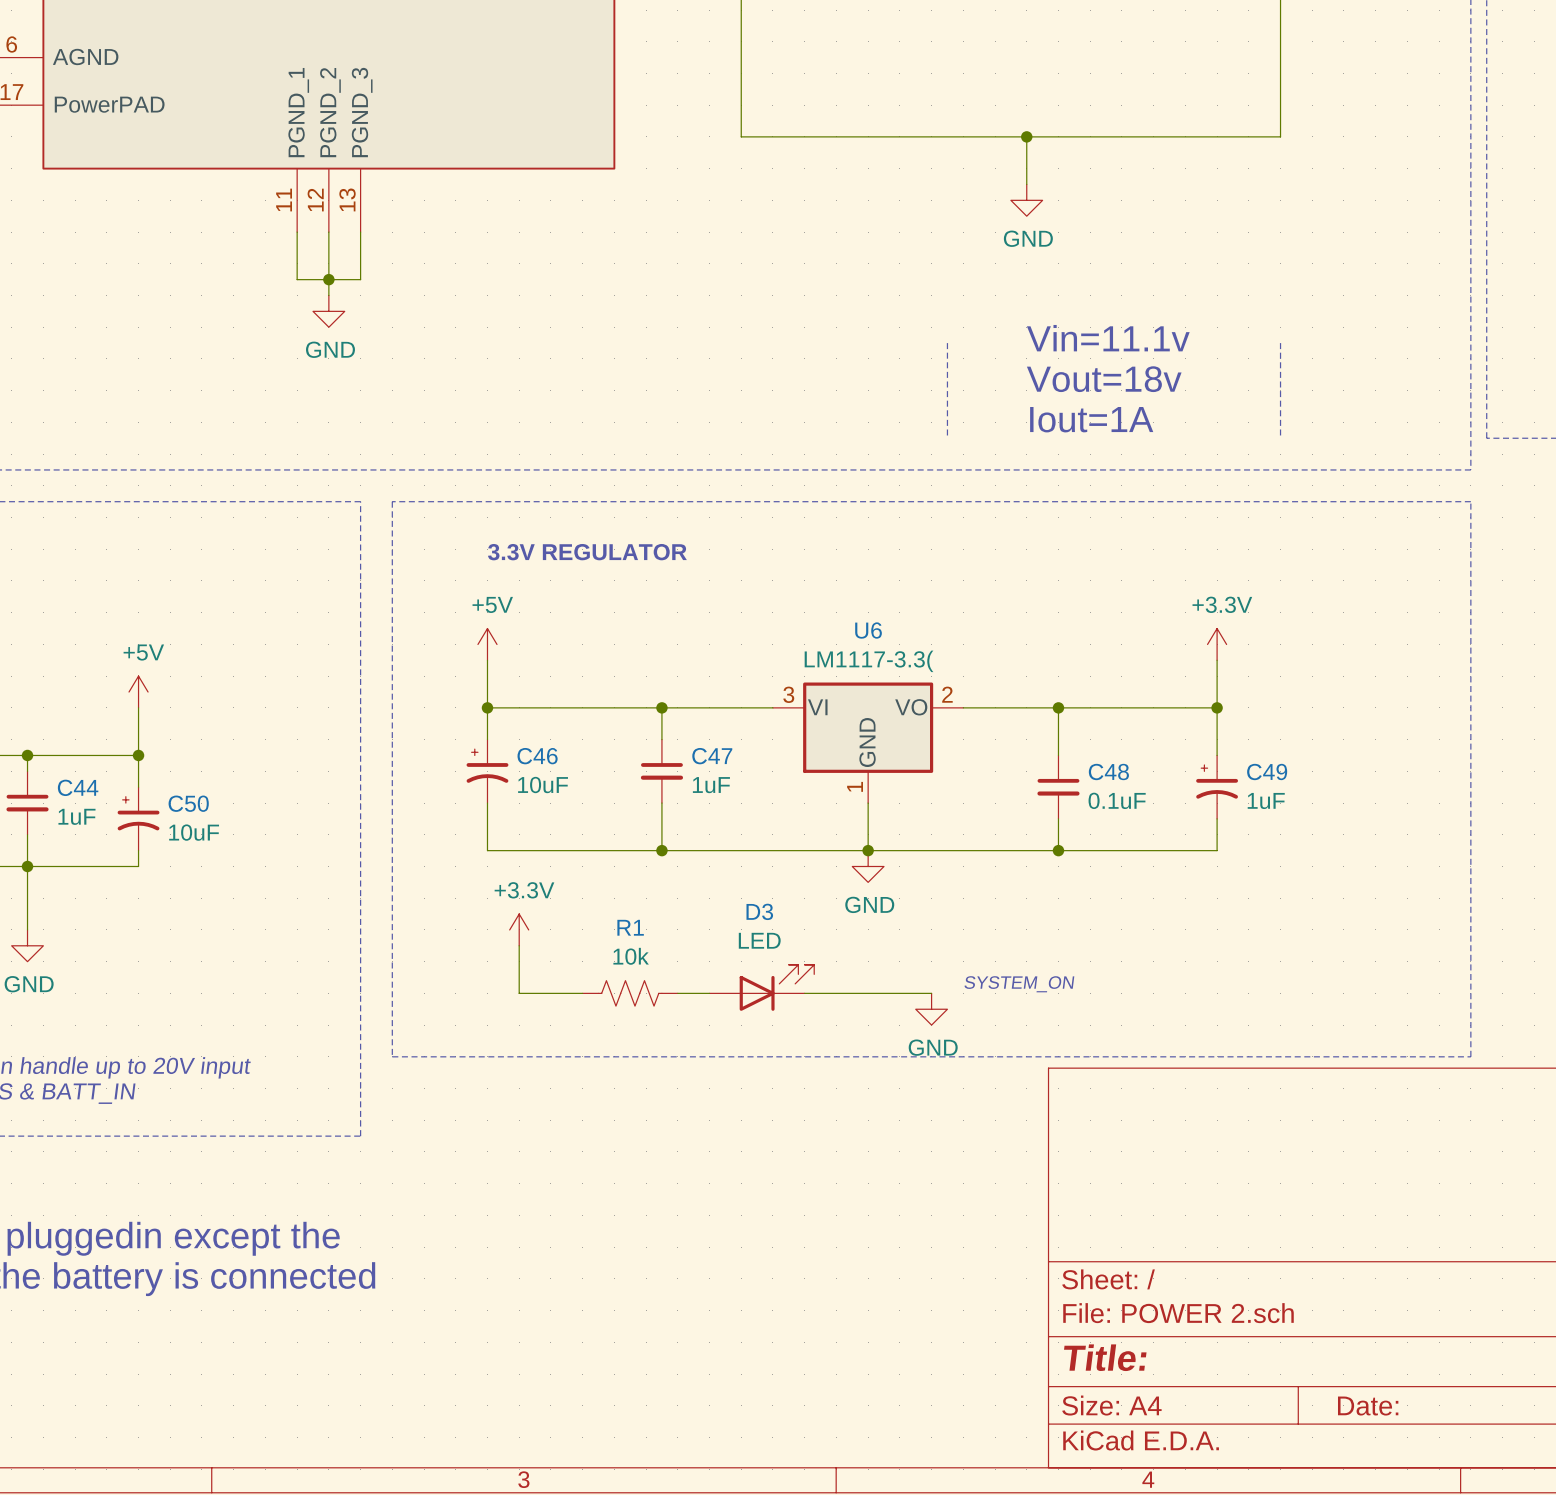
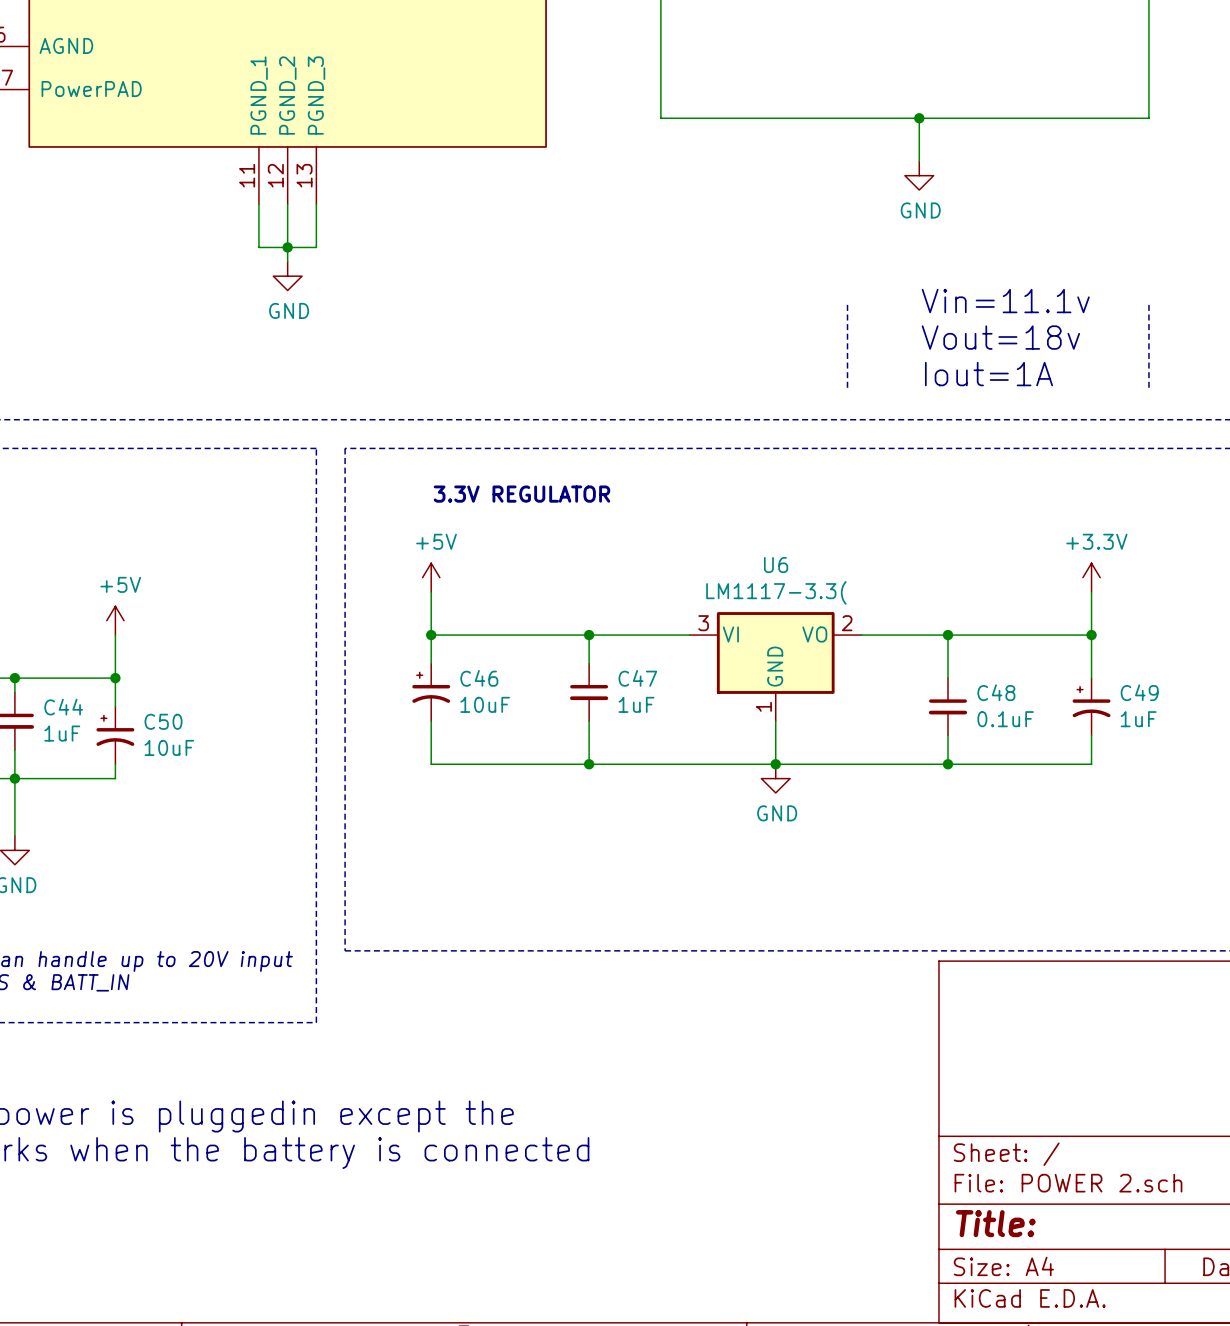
power symbol: +3.3V (519, 929) -> none
wire: (519, 945) (519, 993) (582, 993) -> none
text: SYSTEM_ON (1019, 984) -> none
D3: LED (761, 987) -> none
R1: 10k (630, 993) -> none
wire: (677, 993) (709, 993) -> none
wire: (804, 993) (931, 993) -> none
power symbol: GND (931, 1009) -> none

